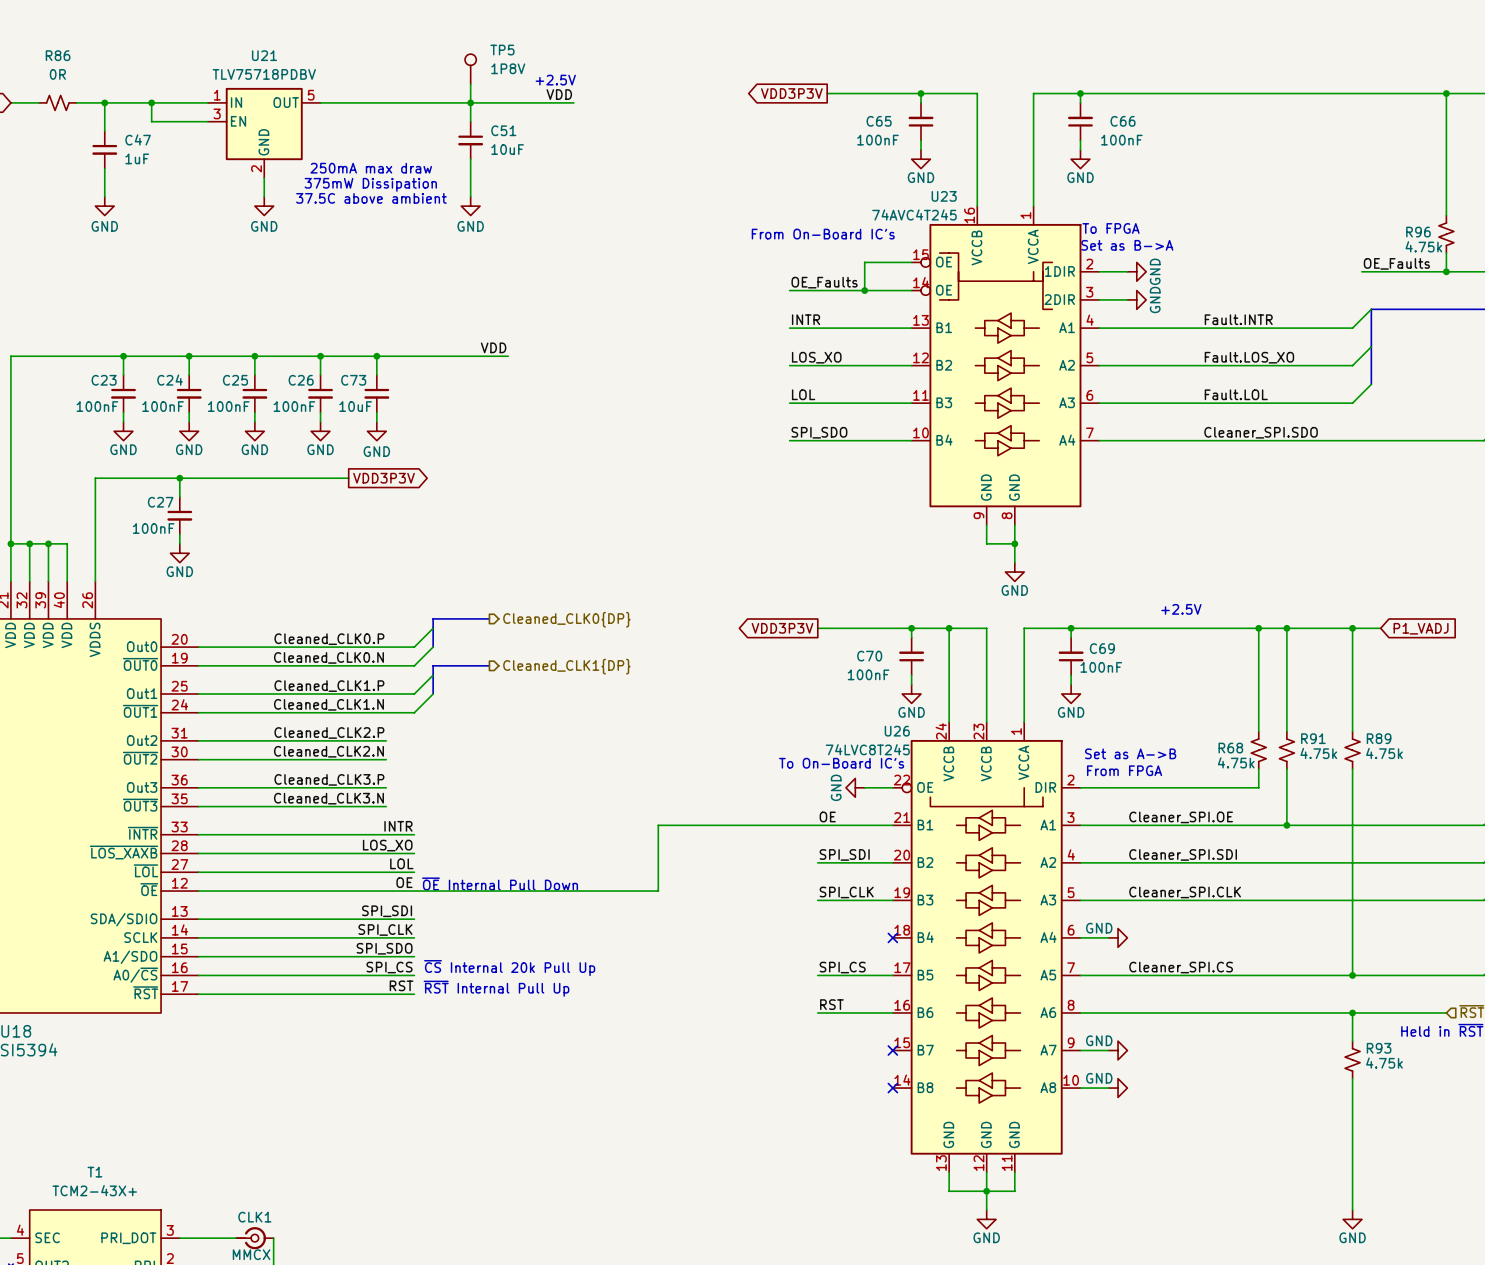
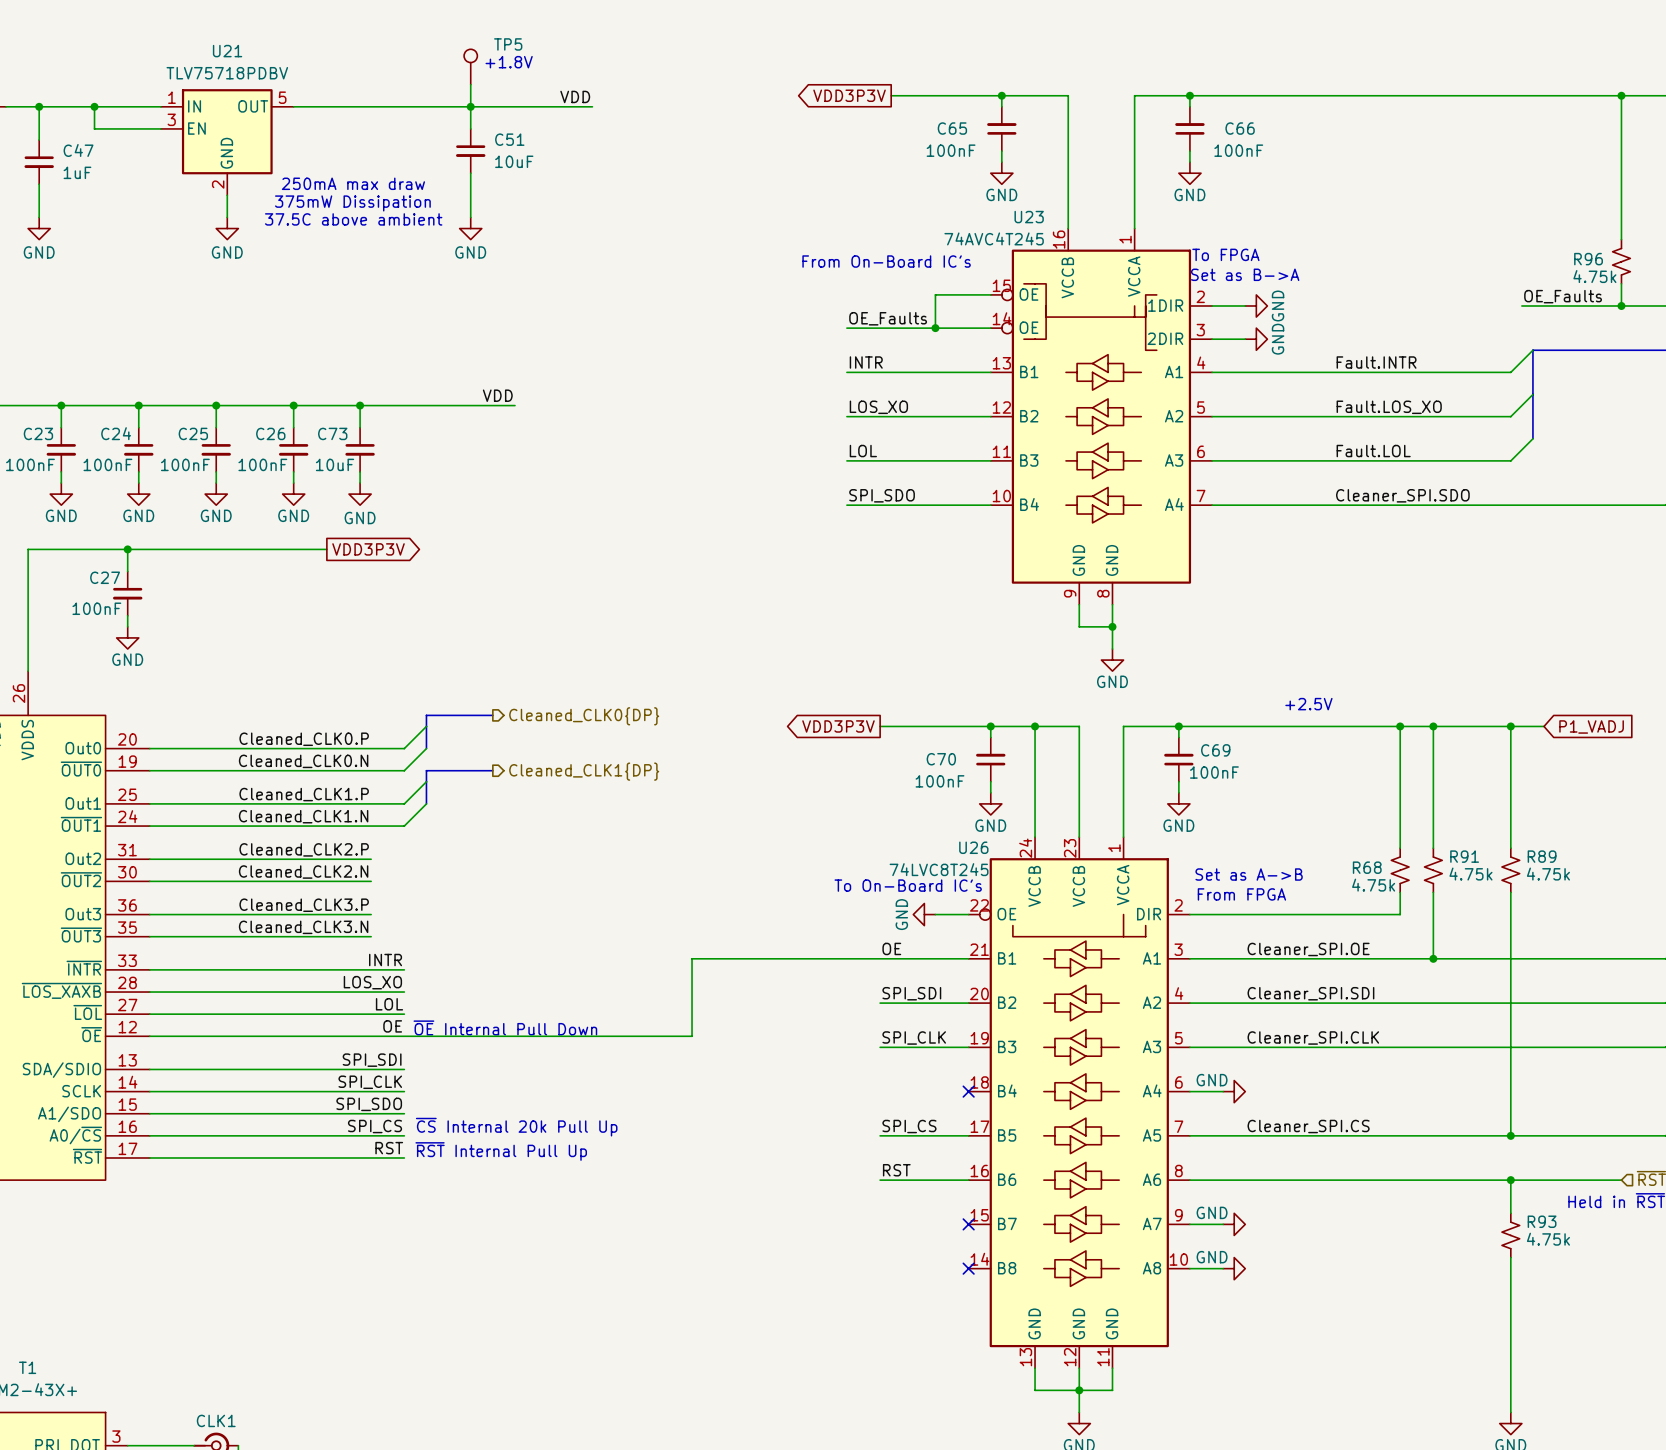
text: none -> +1.8V (509, 62)
TP5 value: 1P8V (508, 68) -> none
text: +2.5V (555, 80) -> none

